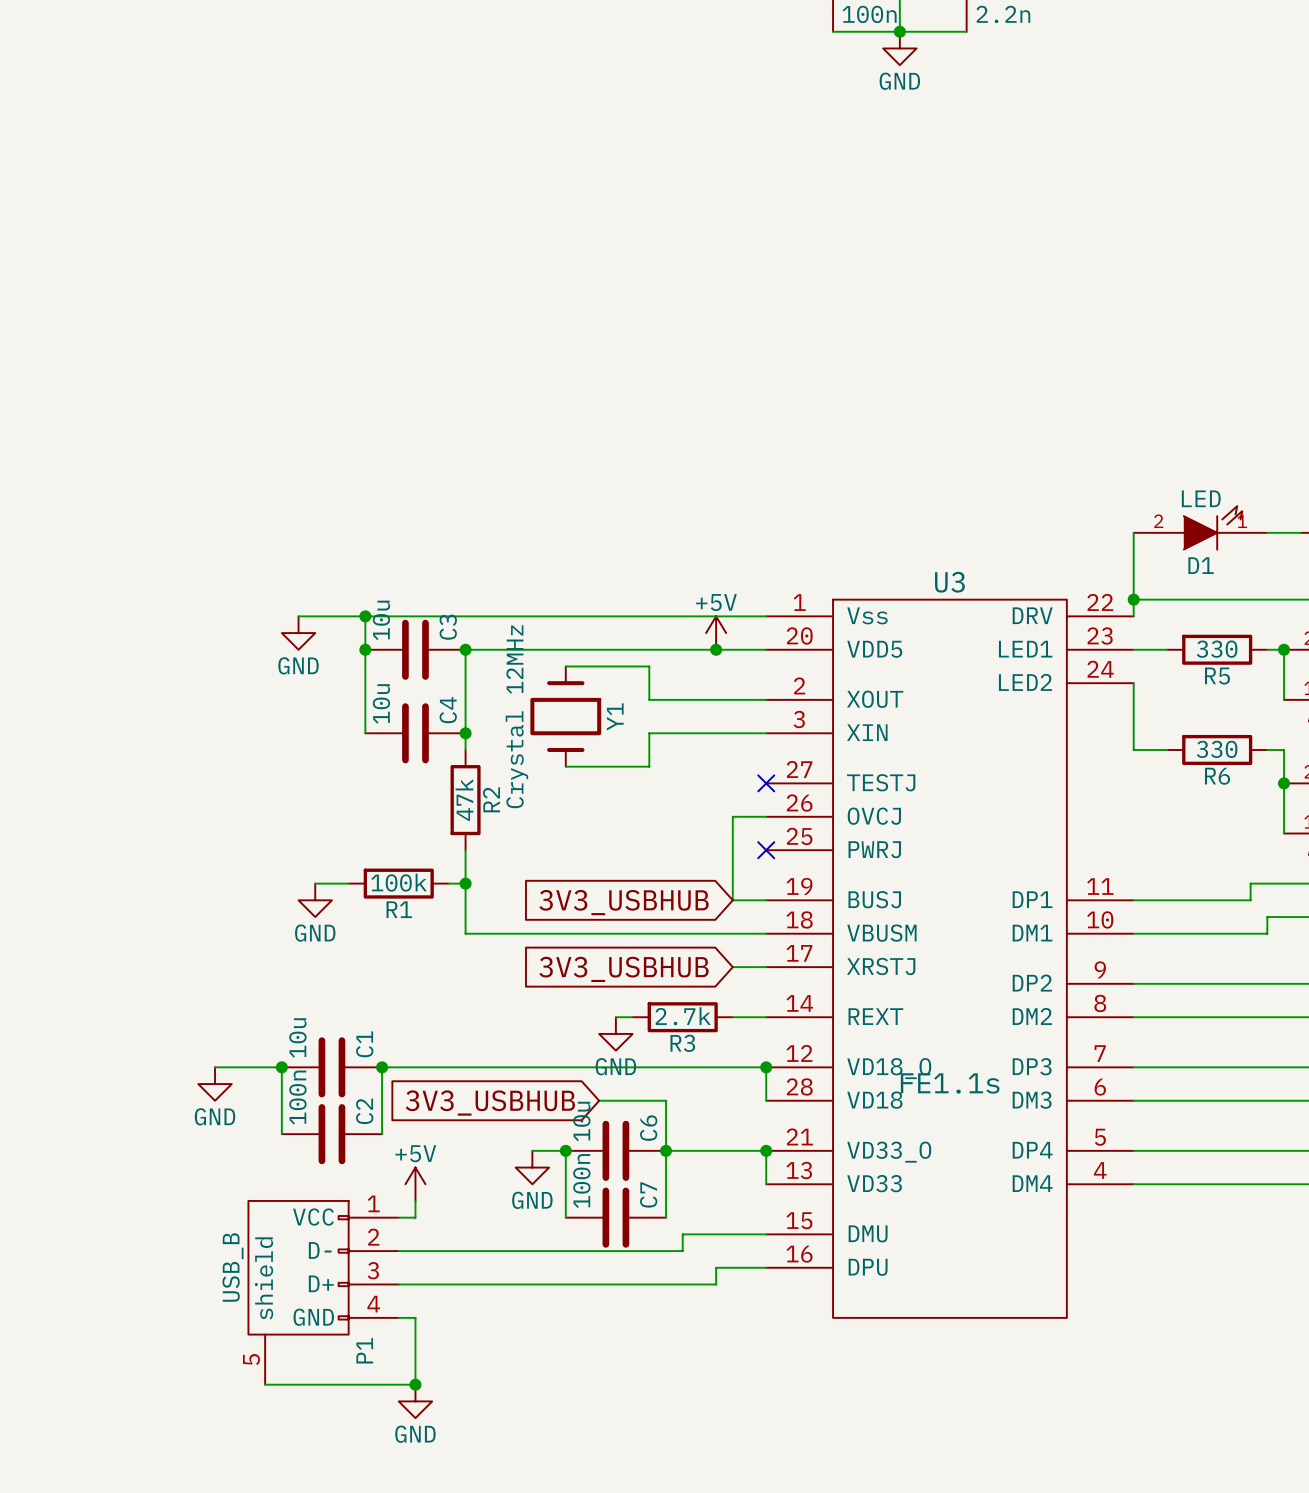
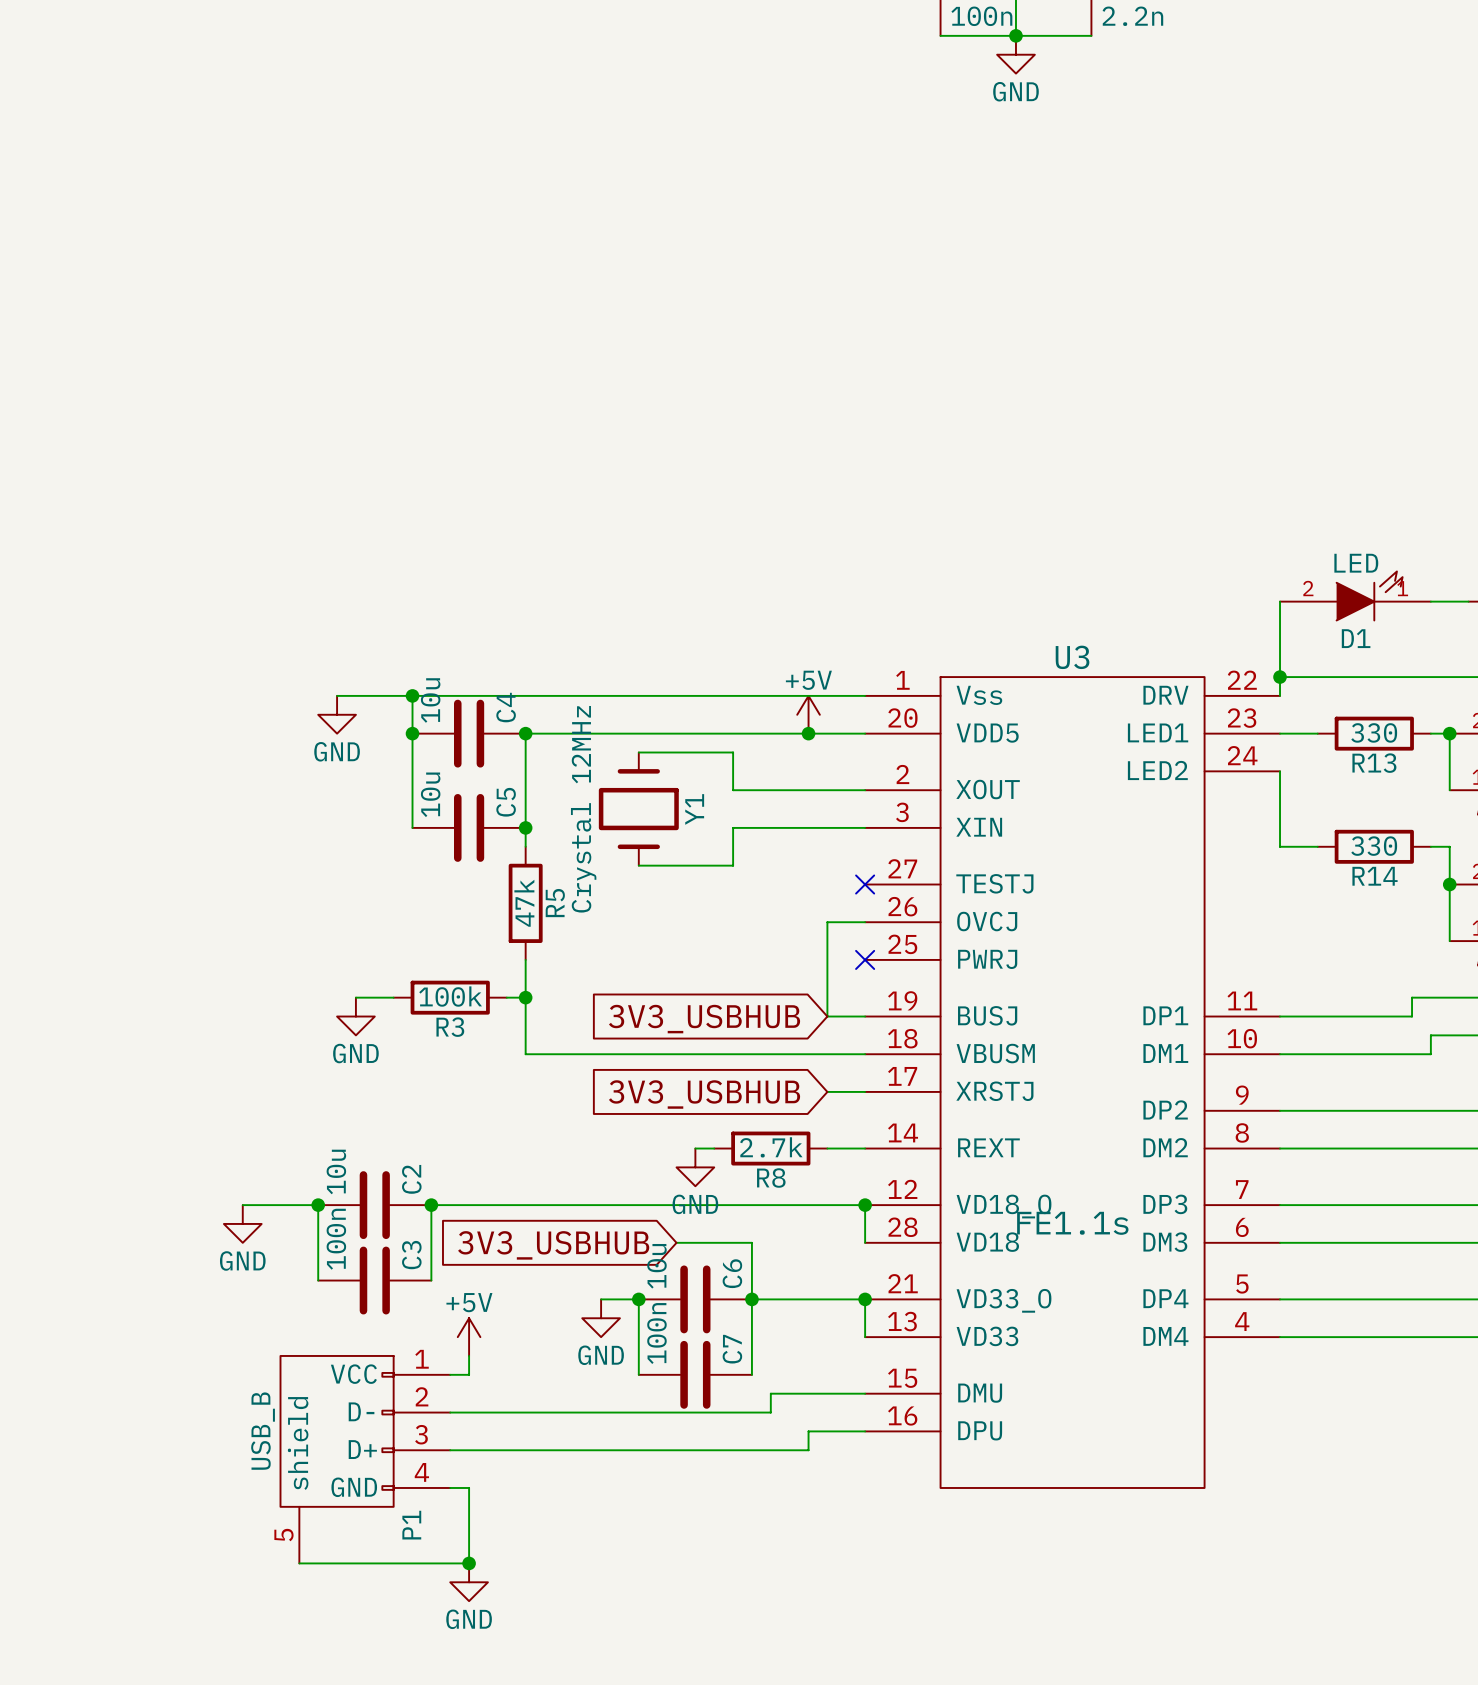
C3 name: C3 (448, 627) -> C4 (506, 707)
R5 name: R5 (1217, 676) -> R13 (1374, 763)
C4 name: C4 (448, 710) -> C5 (506, 802)
R6 name: R6 (1217, 776) -> R14 (1375, 876)
R2 name: R2 (491, 799) -> R5 (555, 903)
R1 name: R1 (399, 909) -> R3 (450, 1027)
R3 name: R3 (682, 1043) -> R8 (771, 1178)
C1 name: C1 (364, 1044) -> C2 (411, 1179)
C2 name: C2 (364, 1111) -> C3 (411, 1255)

